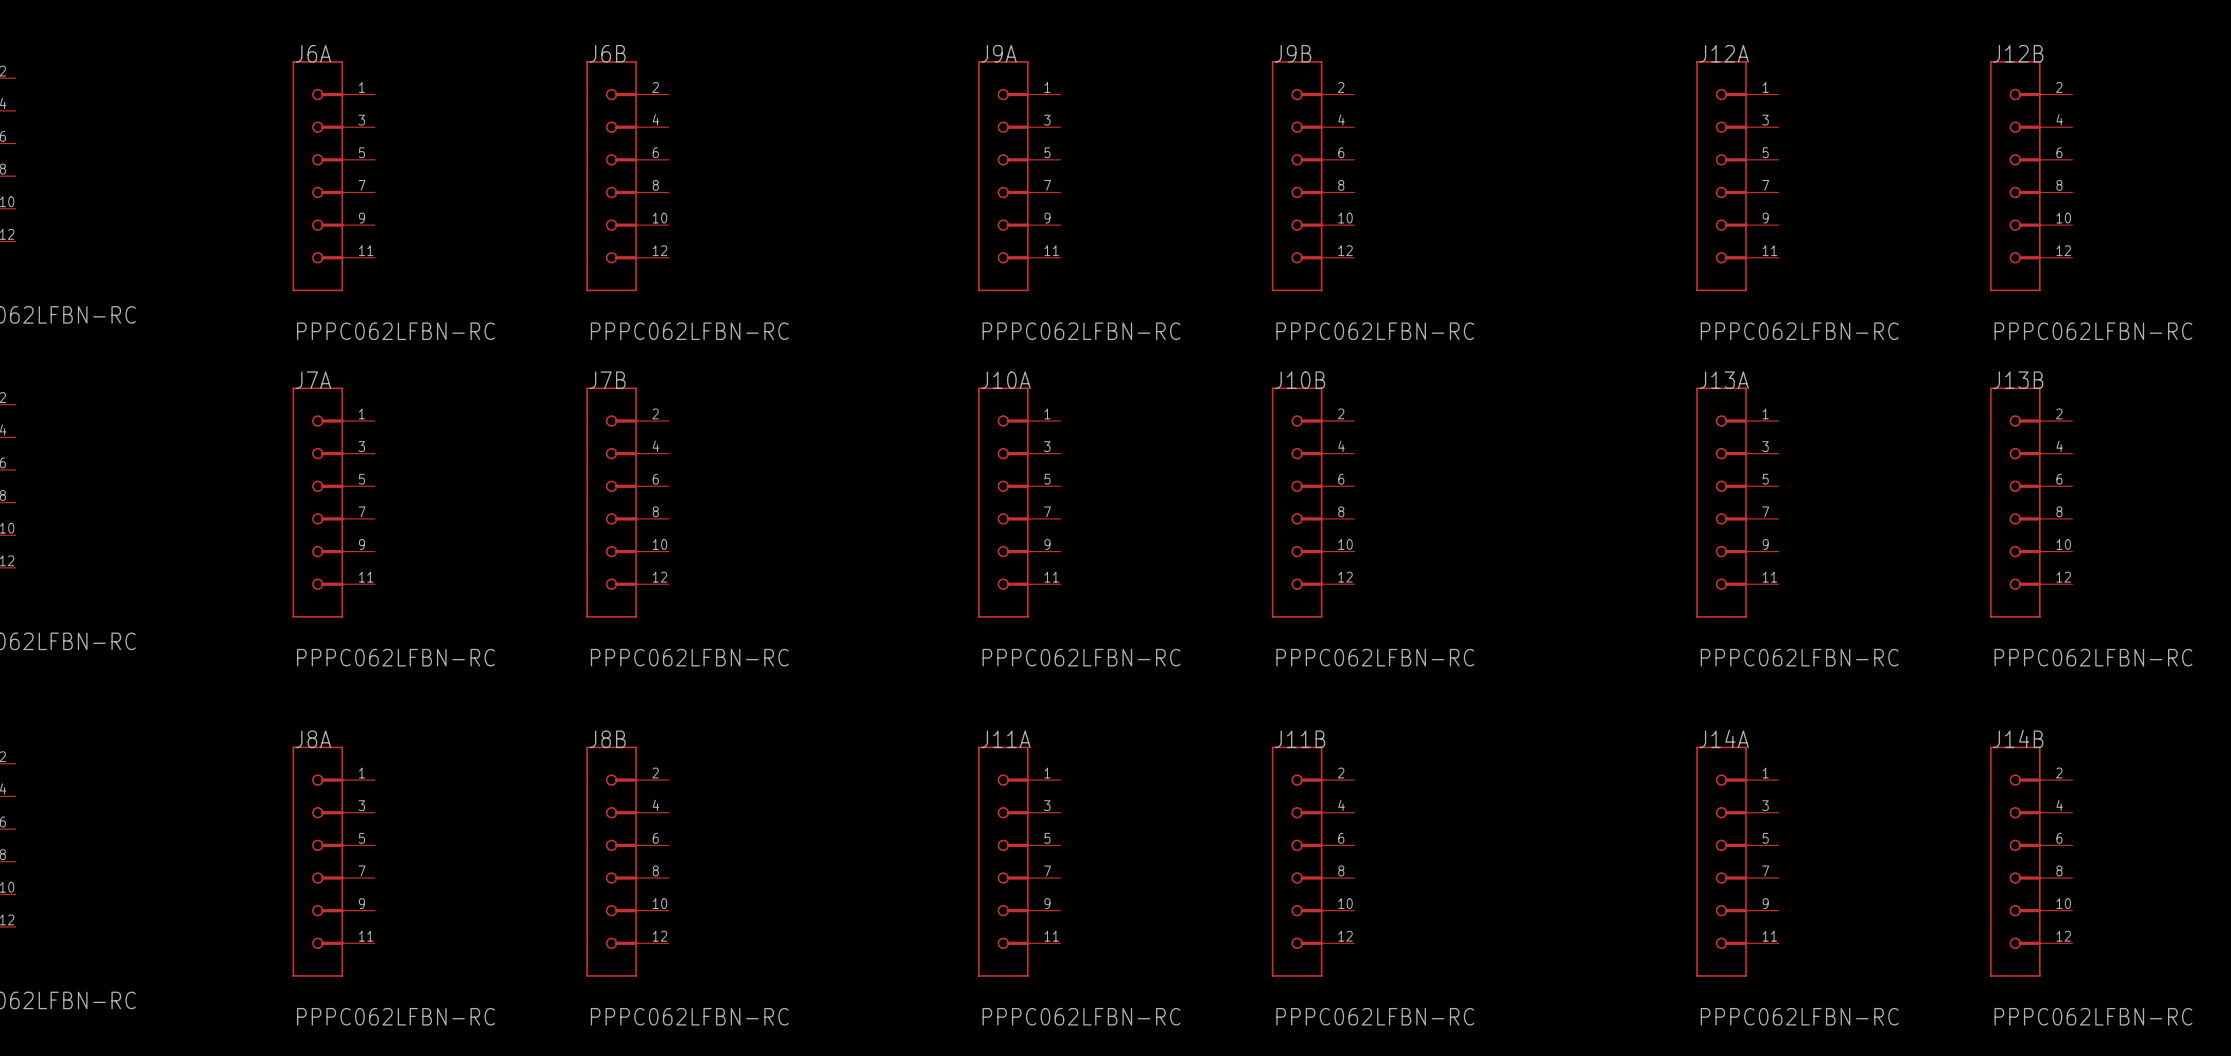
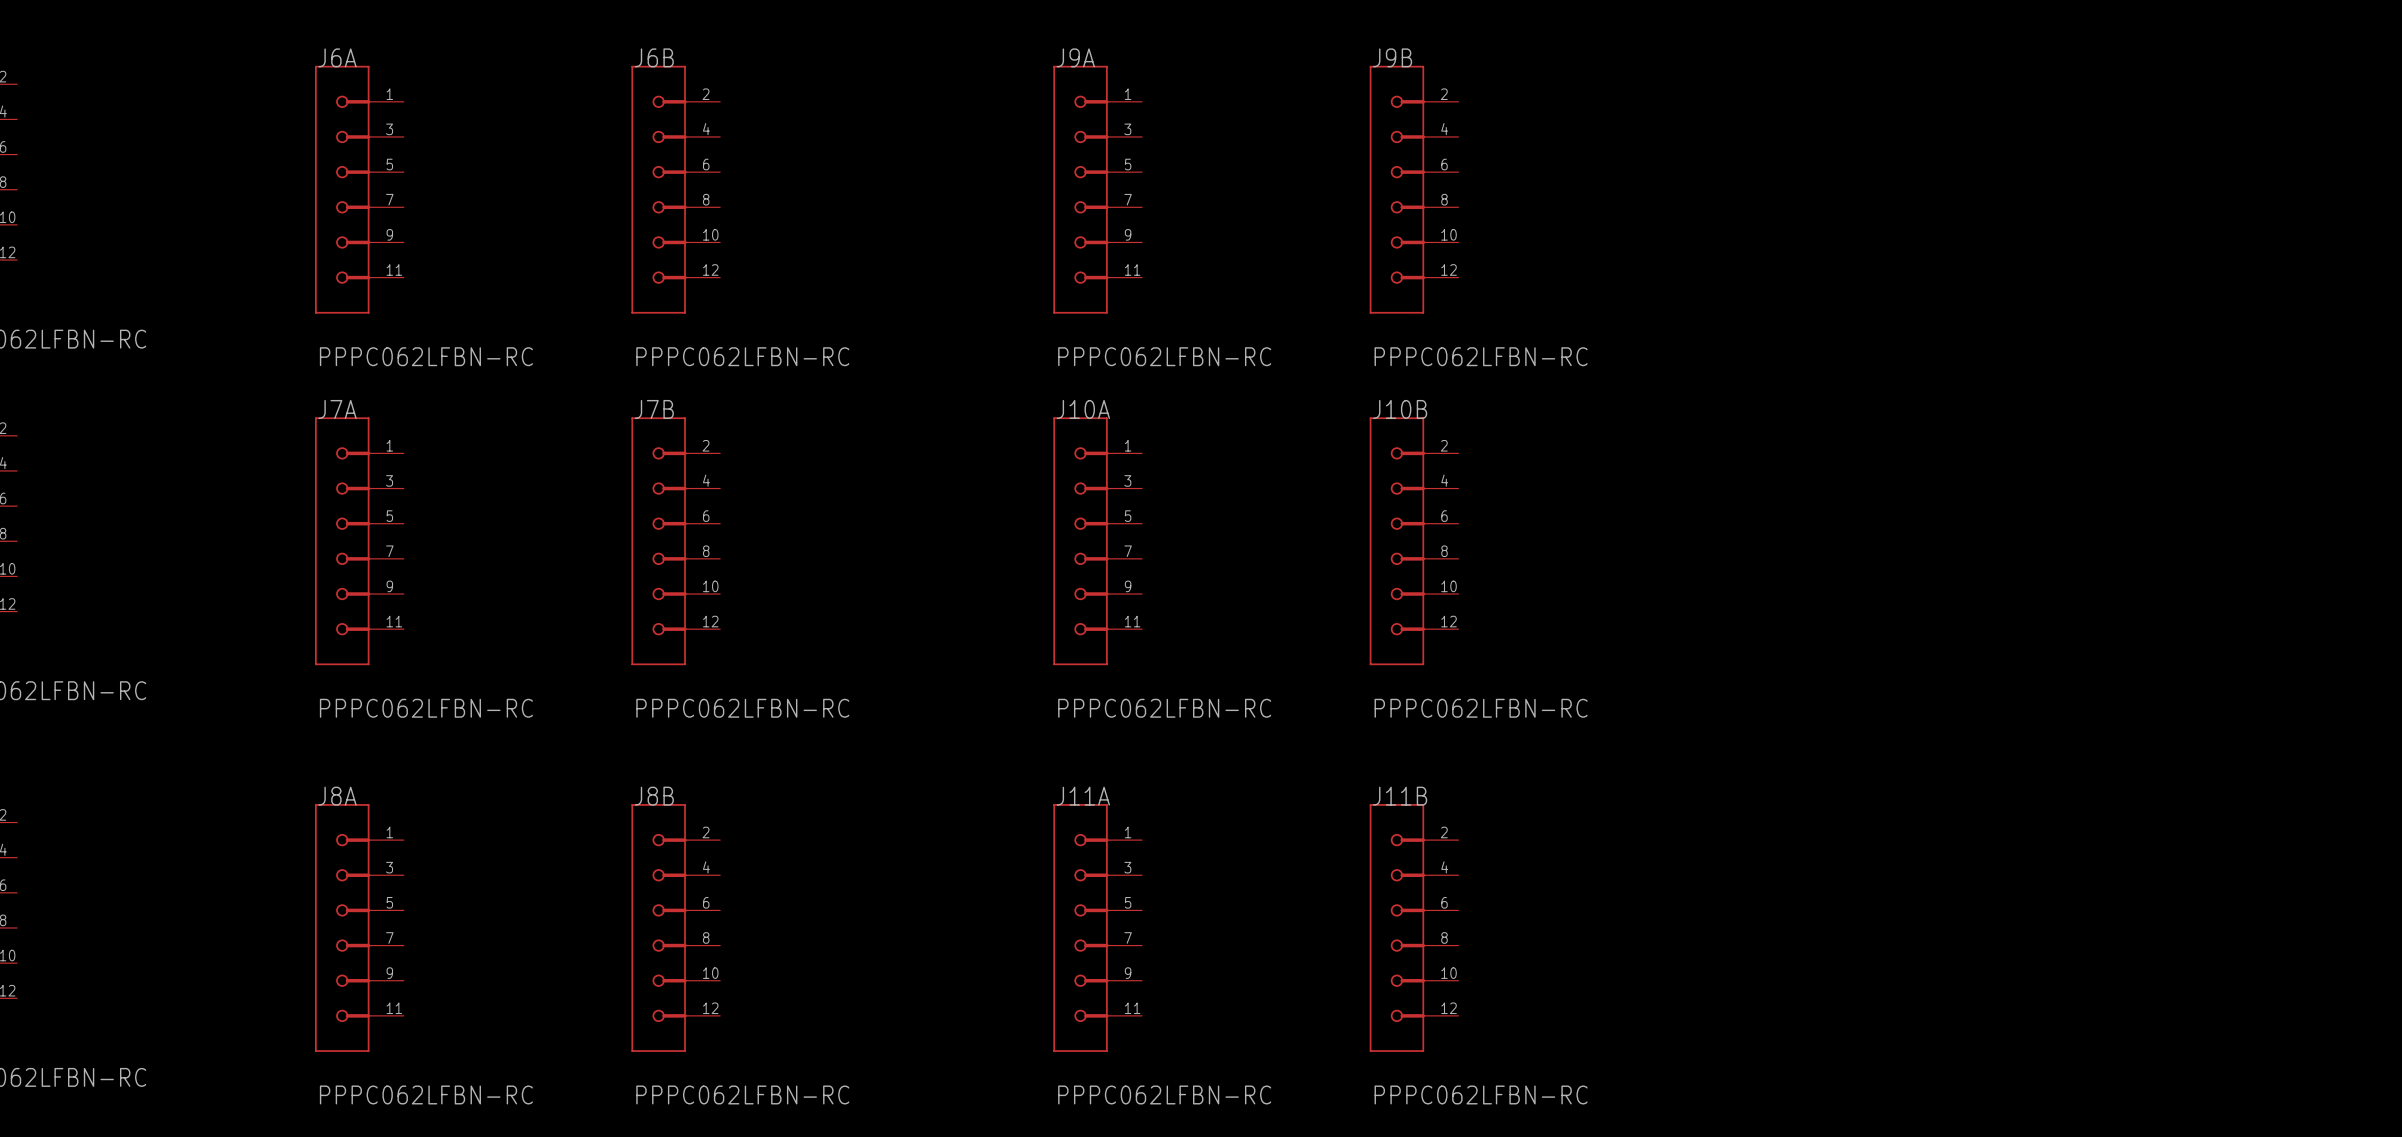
J12A: (1737, 176) -> none
J12B: (2031, 176) -> none
J13A: (1737, 502) -> none
J13B: (2031, 502) -> none
J14A: (1737, 861) -> none
J14B: (2031, 861) -> none

